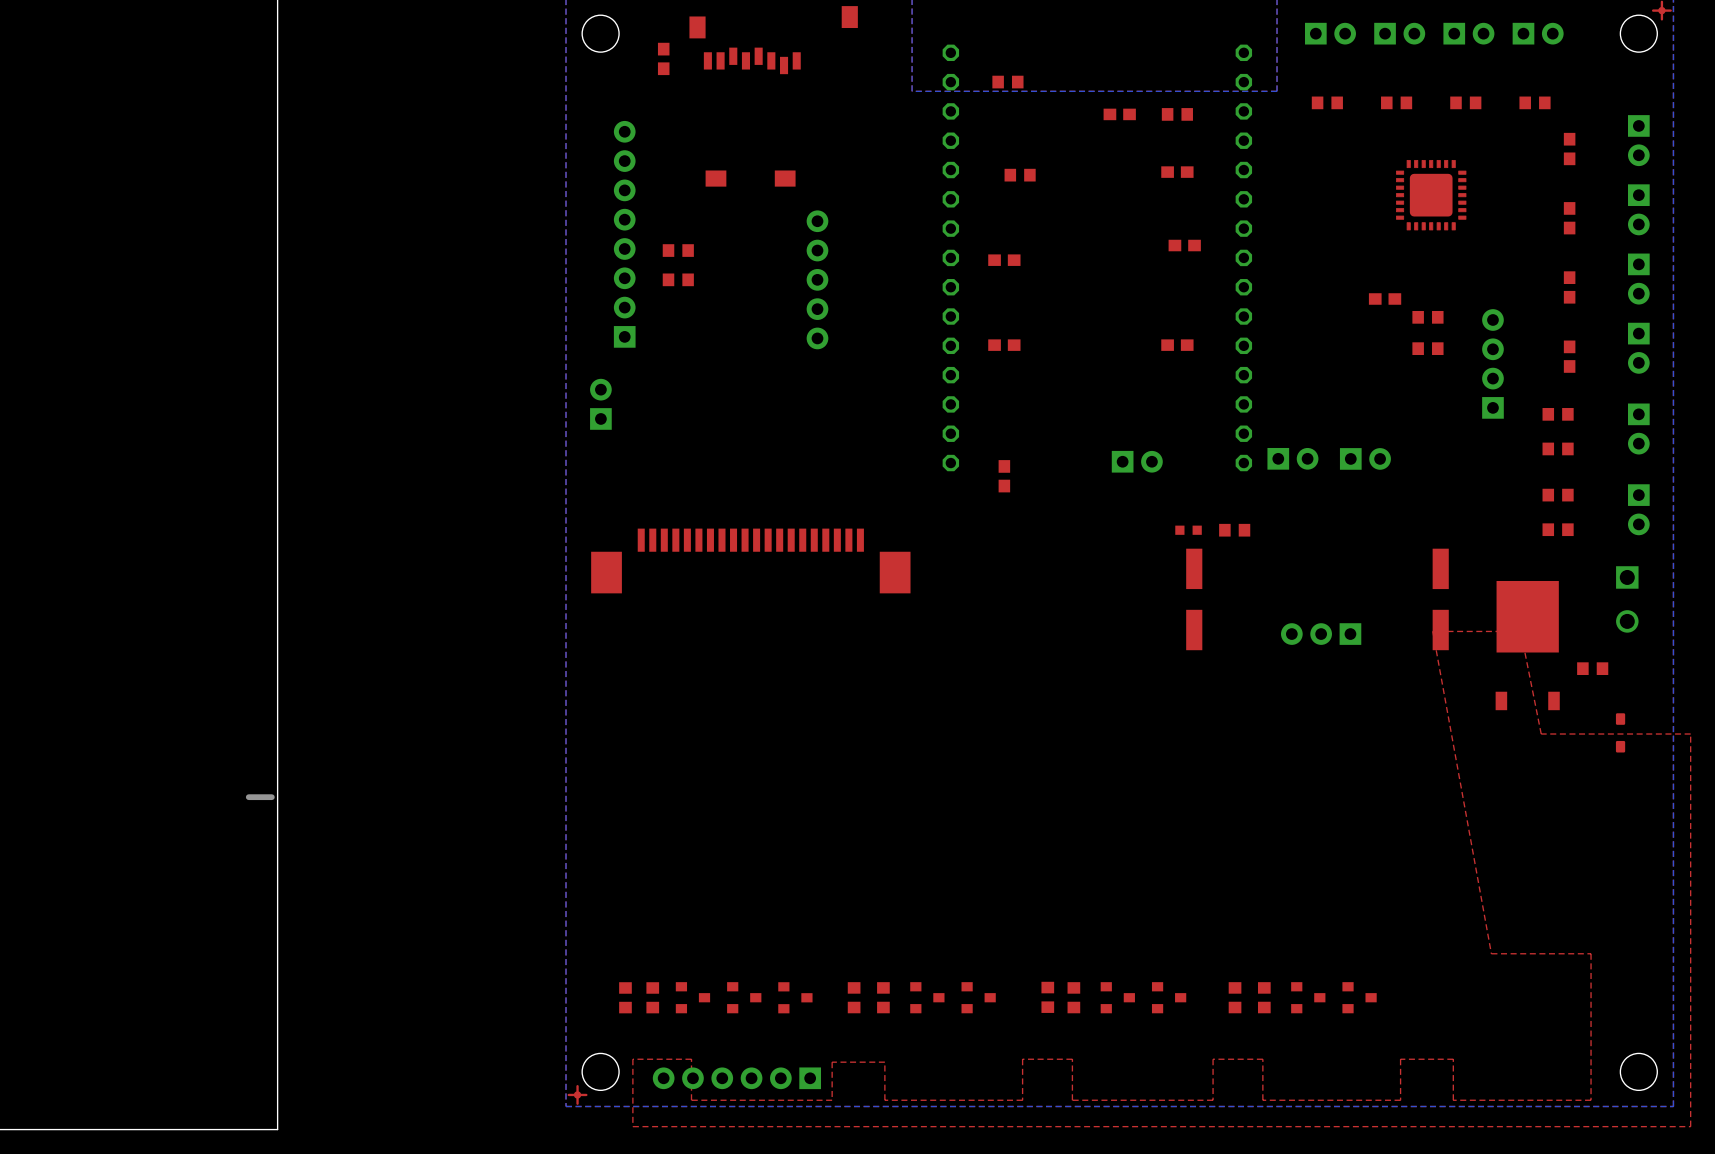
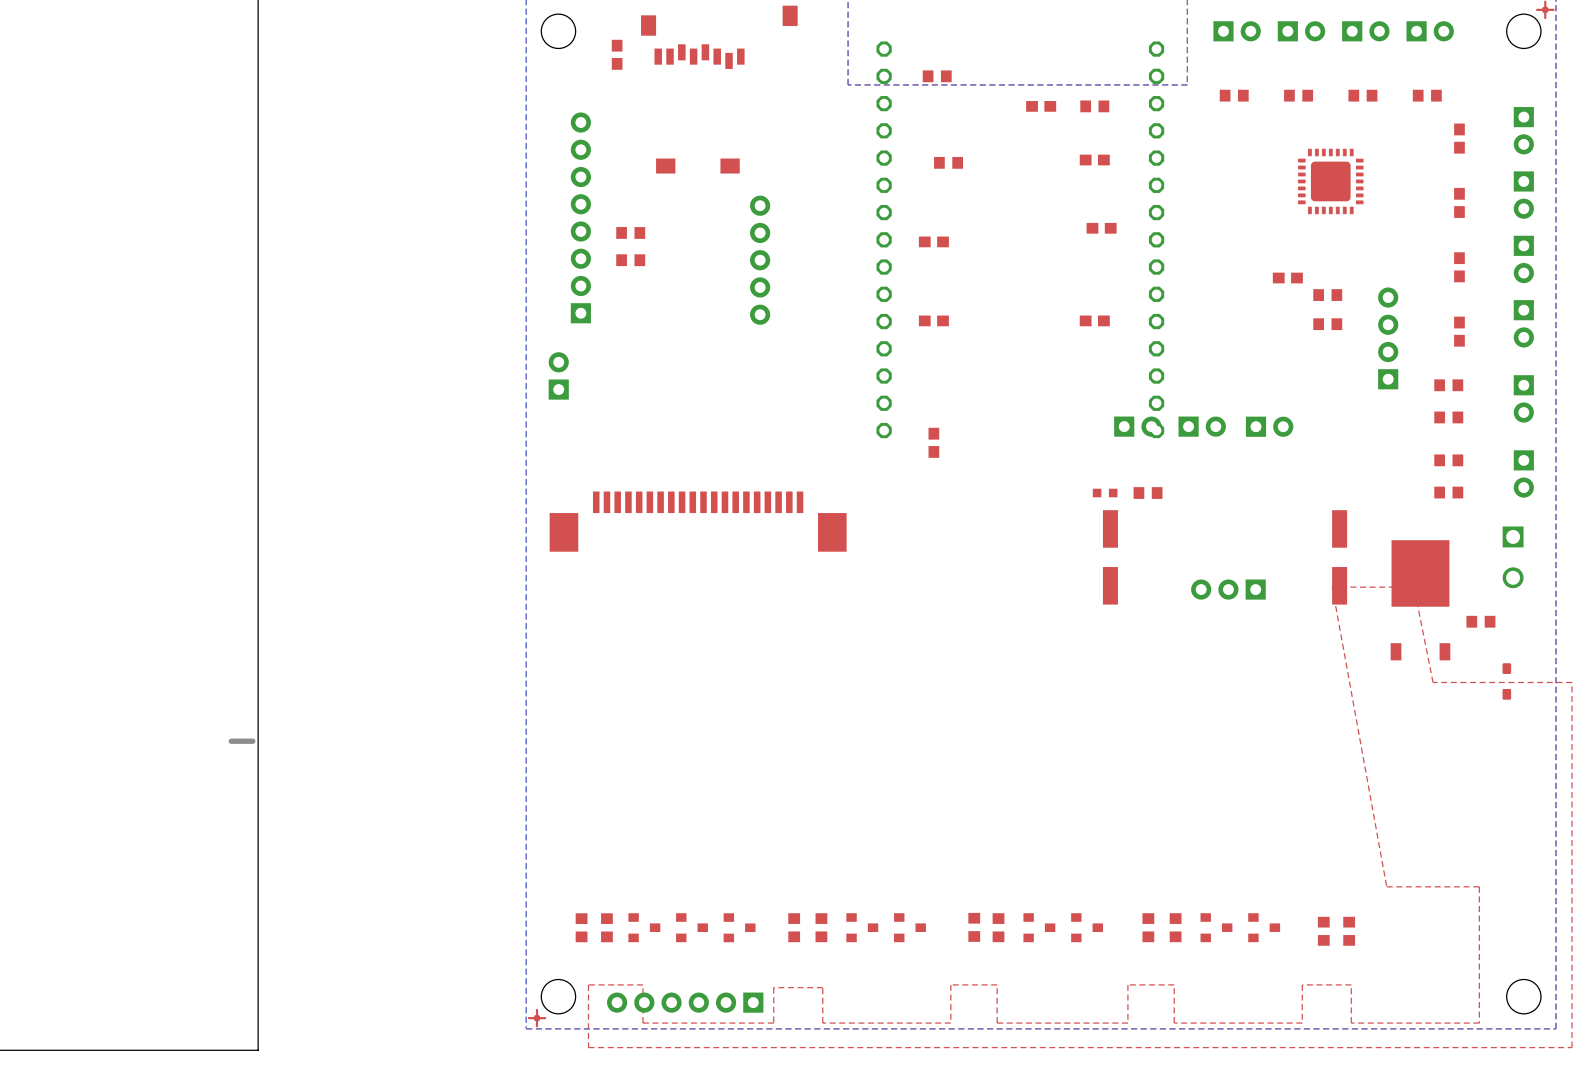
part position: (1137, 461) -> (1137, 426)
part: none -> (1323, 931)
part: none -> (1349, 931)

